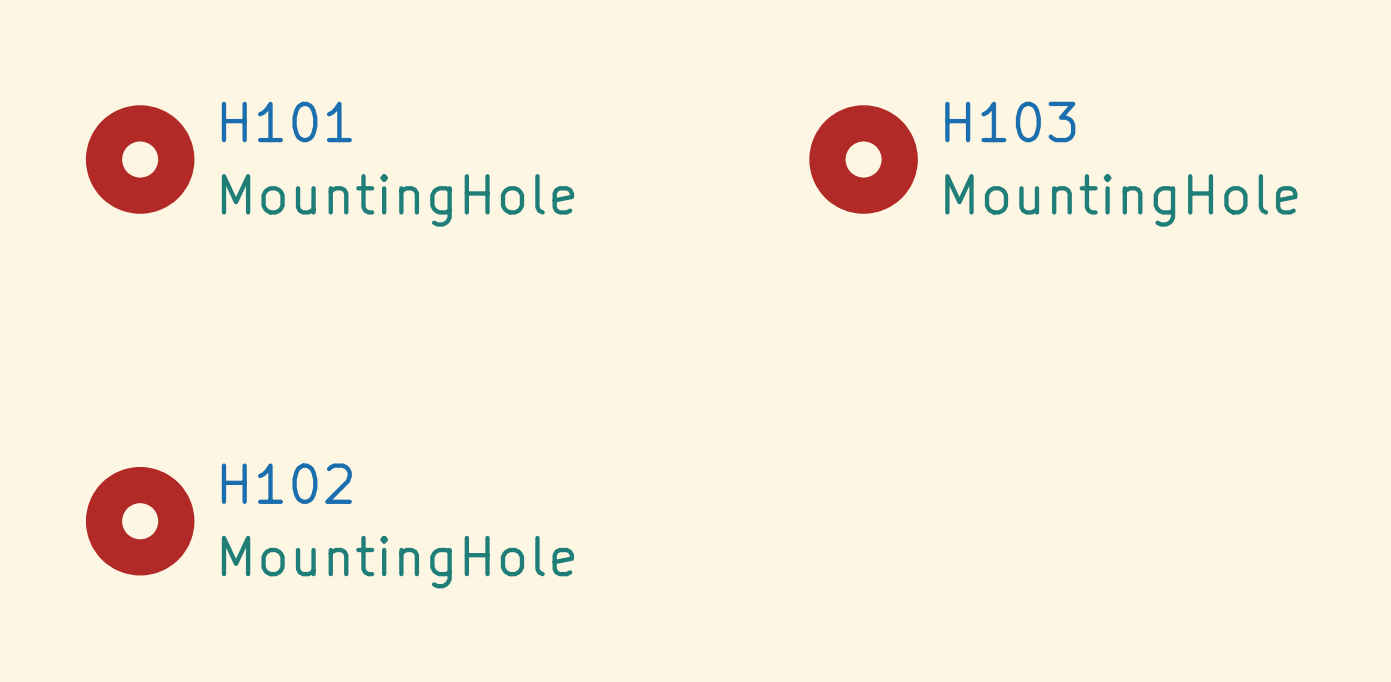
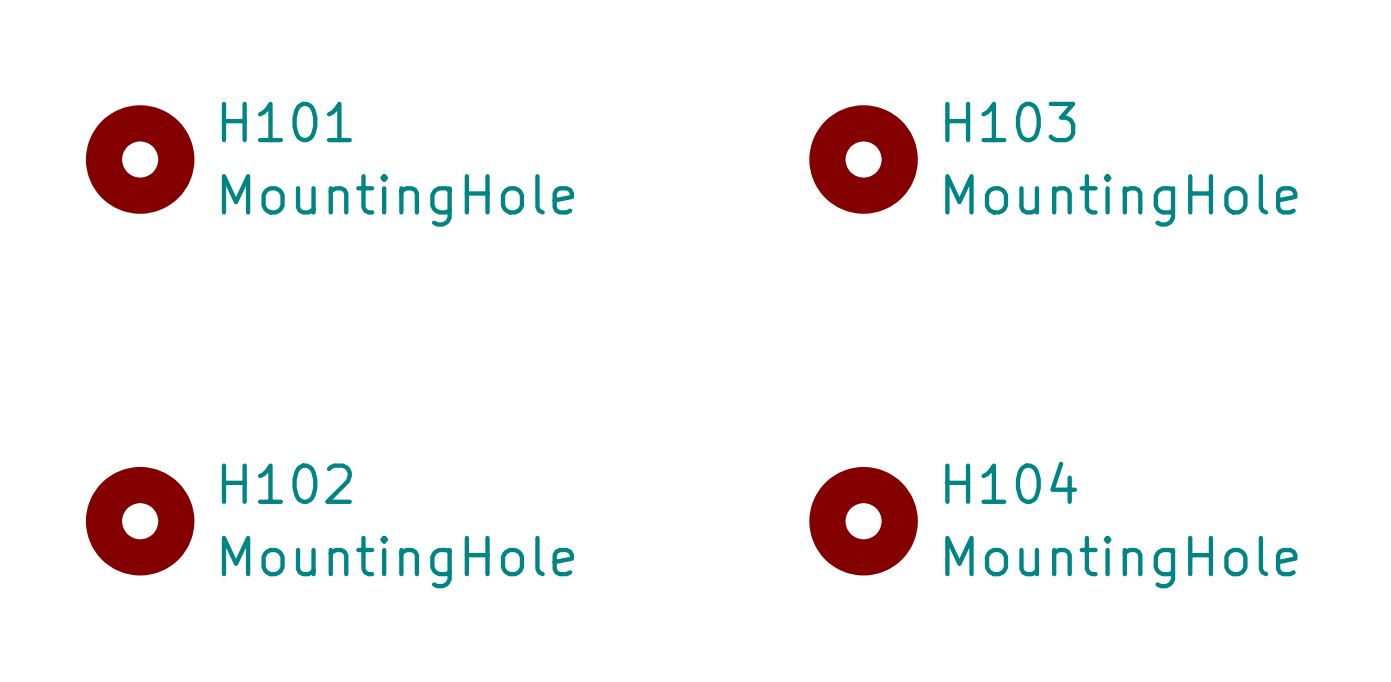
H104: none -> MountingHole (863, 521)

